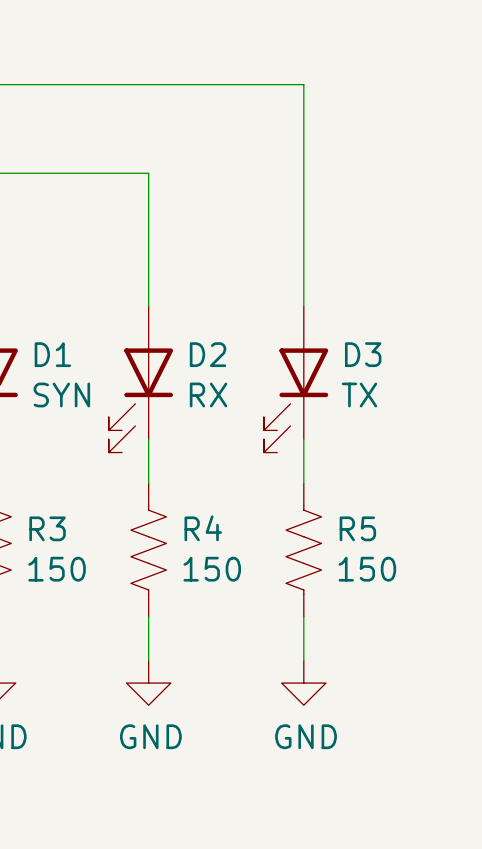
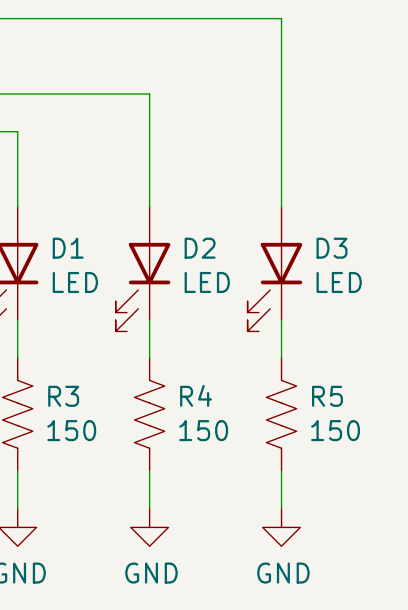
D1 value: SYN (61, 394) -> LED (75, 282)
D2 value: RX (208, 394) -> LED (207, 282)
D3 value: TX (359, 394) -> LED (339, 282)

